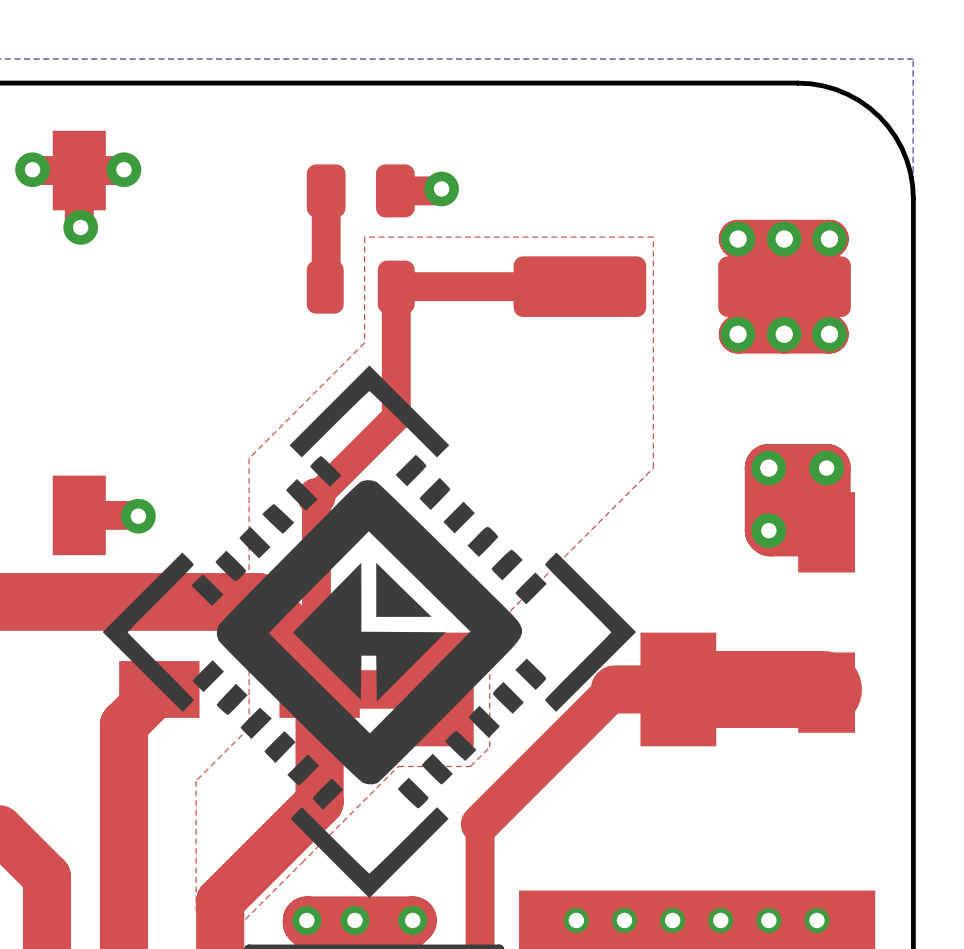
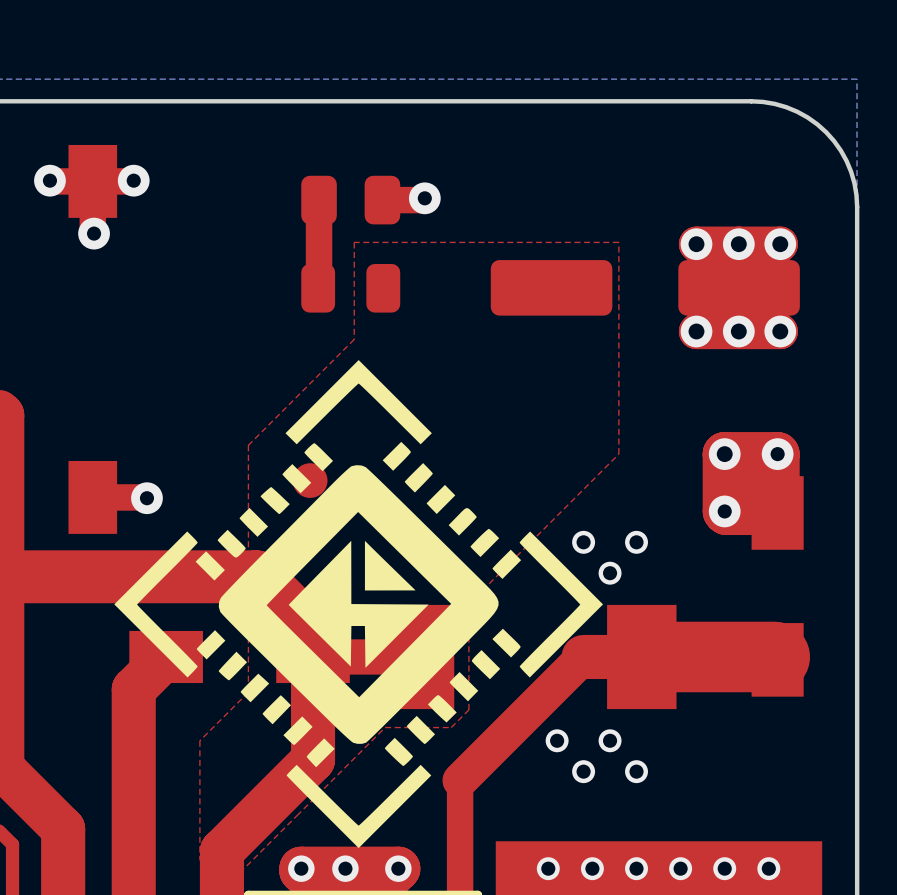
top track: (579, 286) (396, 286) -> none
top track: (396, 287) (396, 417) (316, 496) (316, 686) -> none
via: none -> (583, 542)
via: none -> (636, 542)
via: none -> (610, 573)
via: none -> (557, 740)
via: none -> (610, 740)
via: none -> (583, 771)
via: none -> (636, 771)

